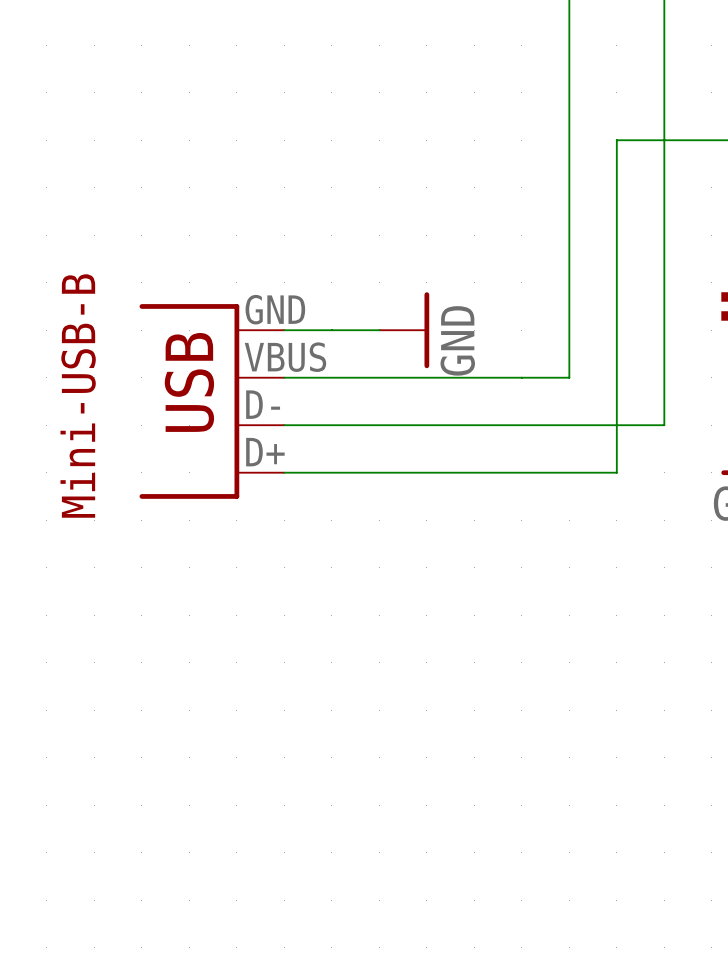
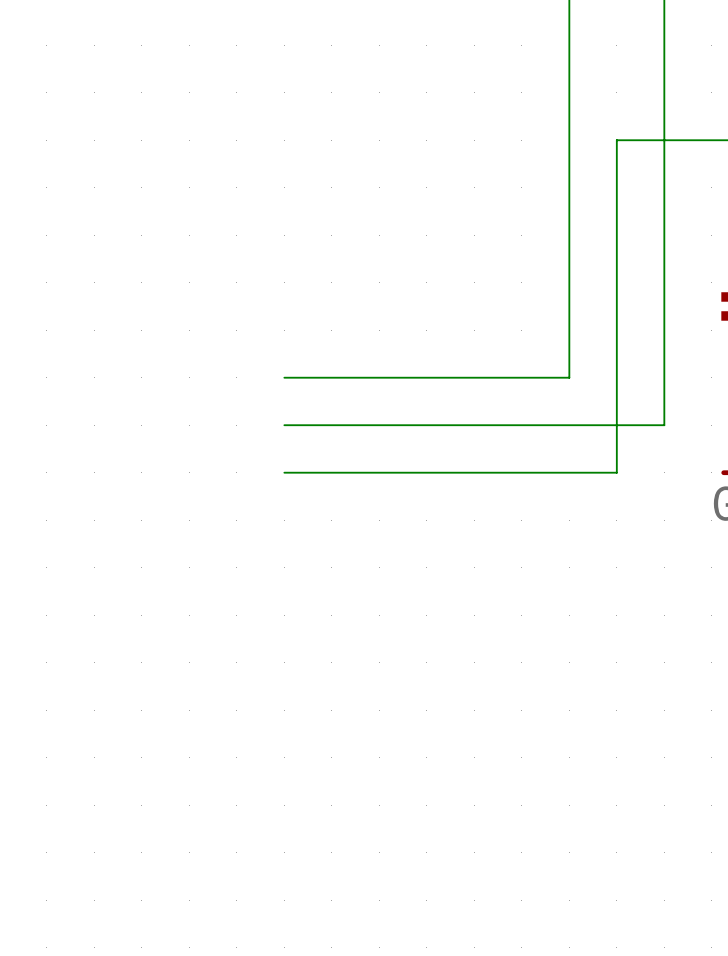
wire: (284, 330) (379, 330) -> none
power symbol: GND (404, 330) -> none
text: Mini-USB-B (78, 396) -> none
part: (211, 401) -> none

